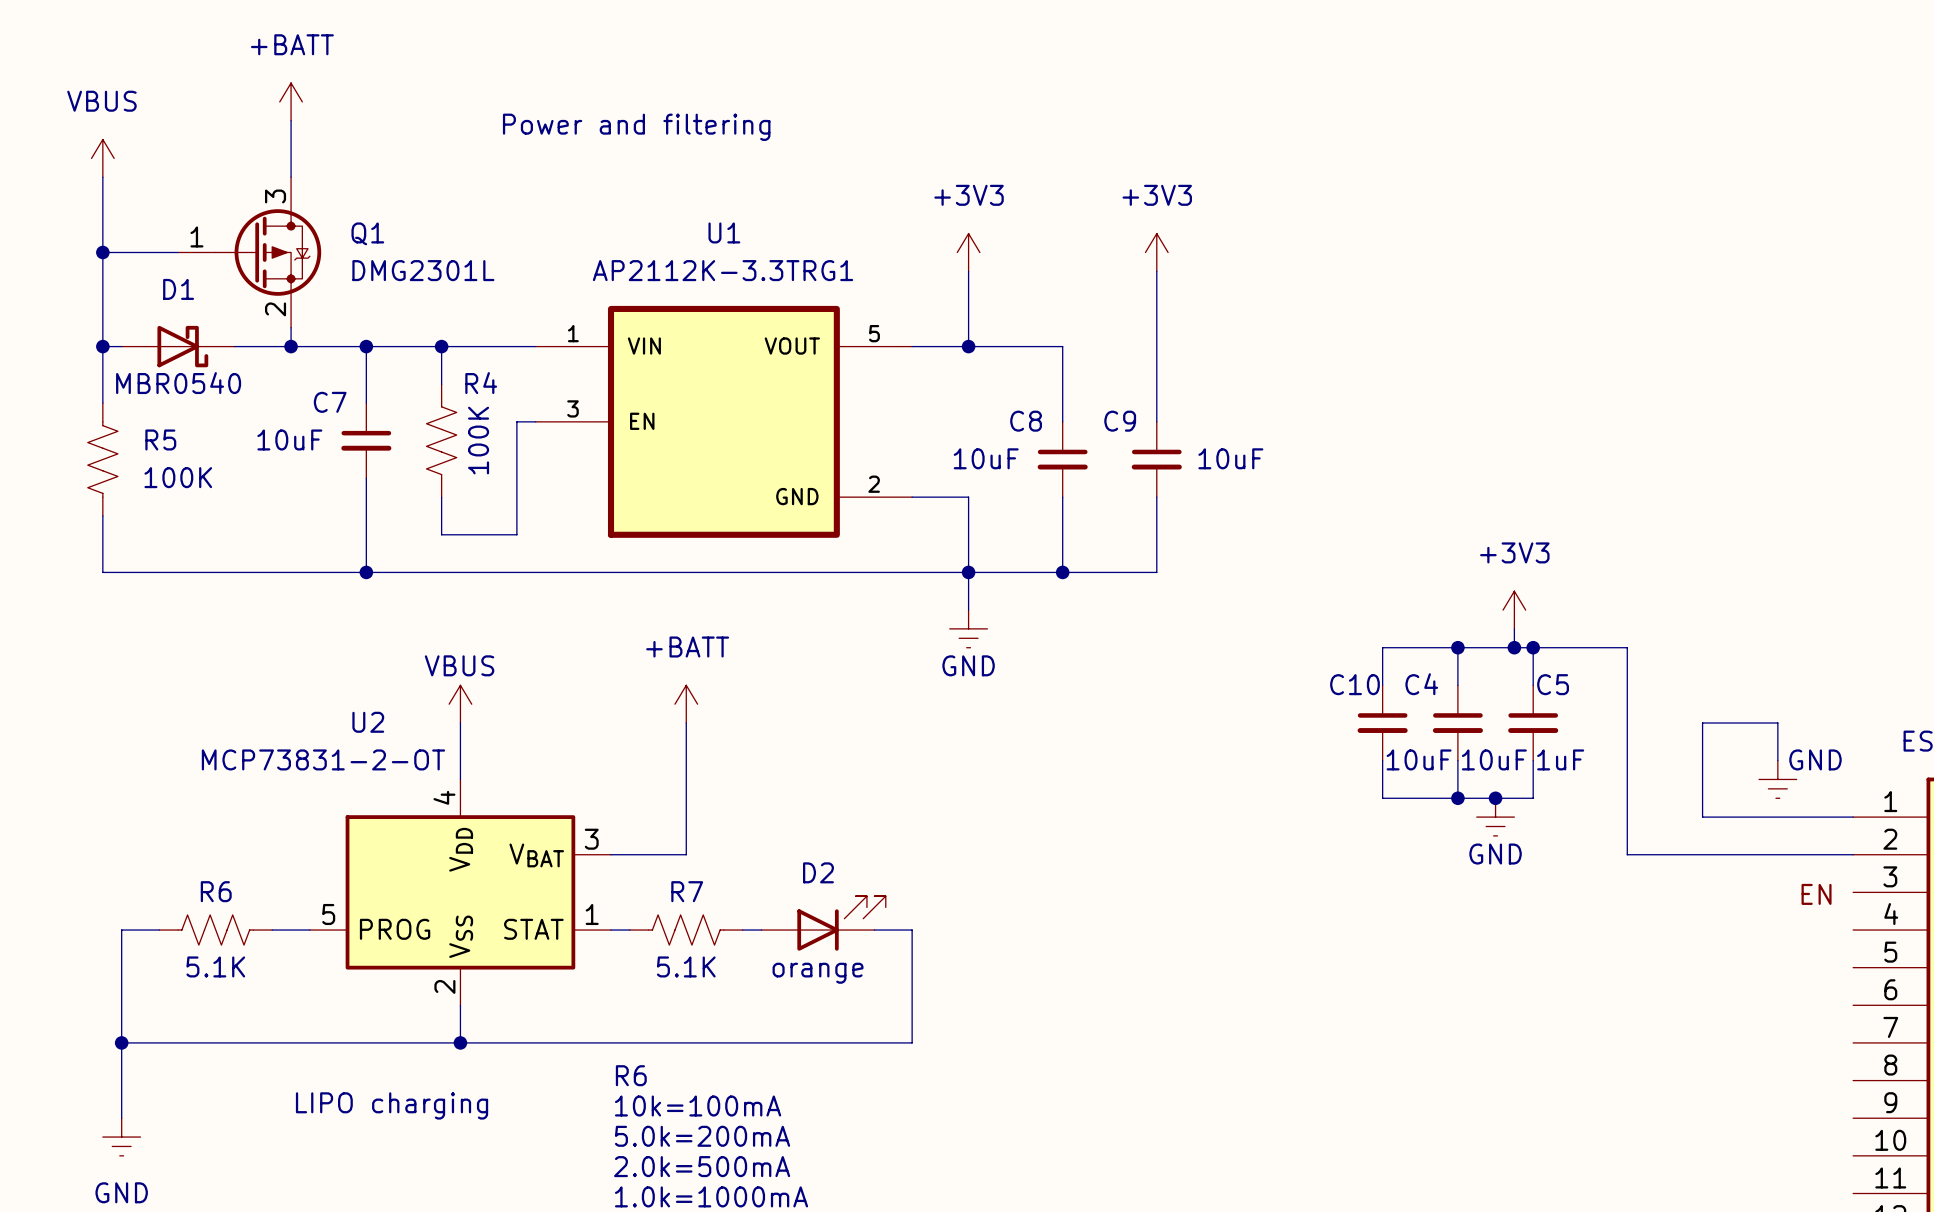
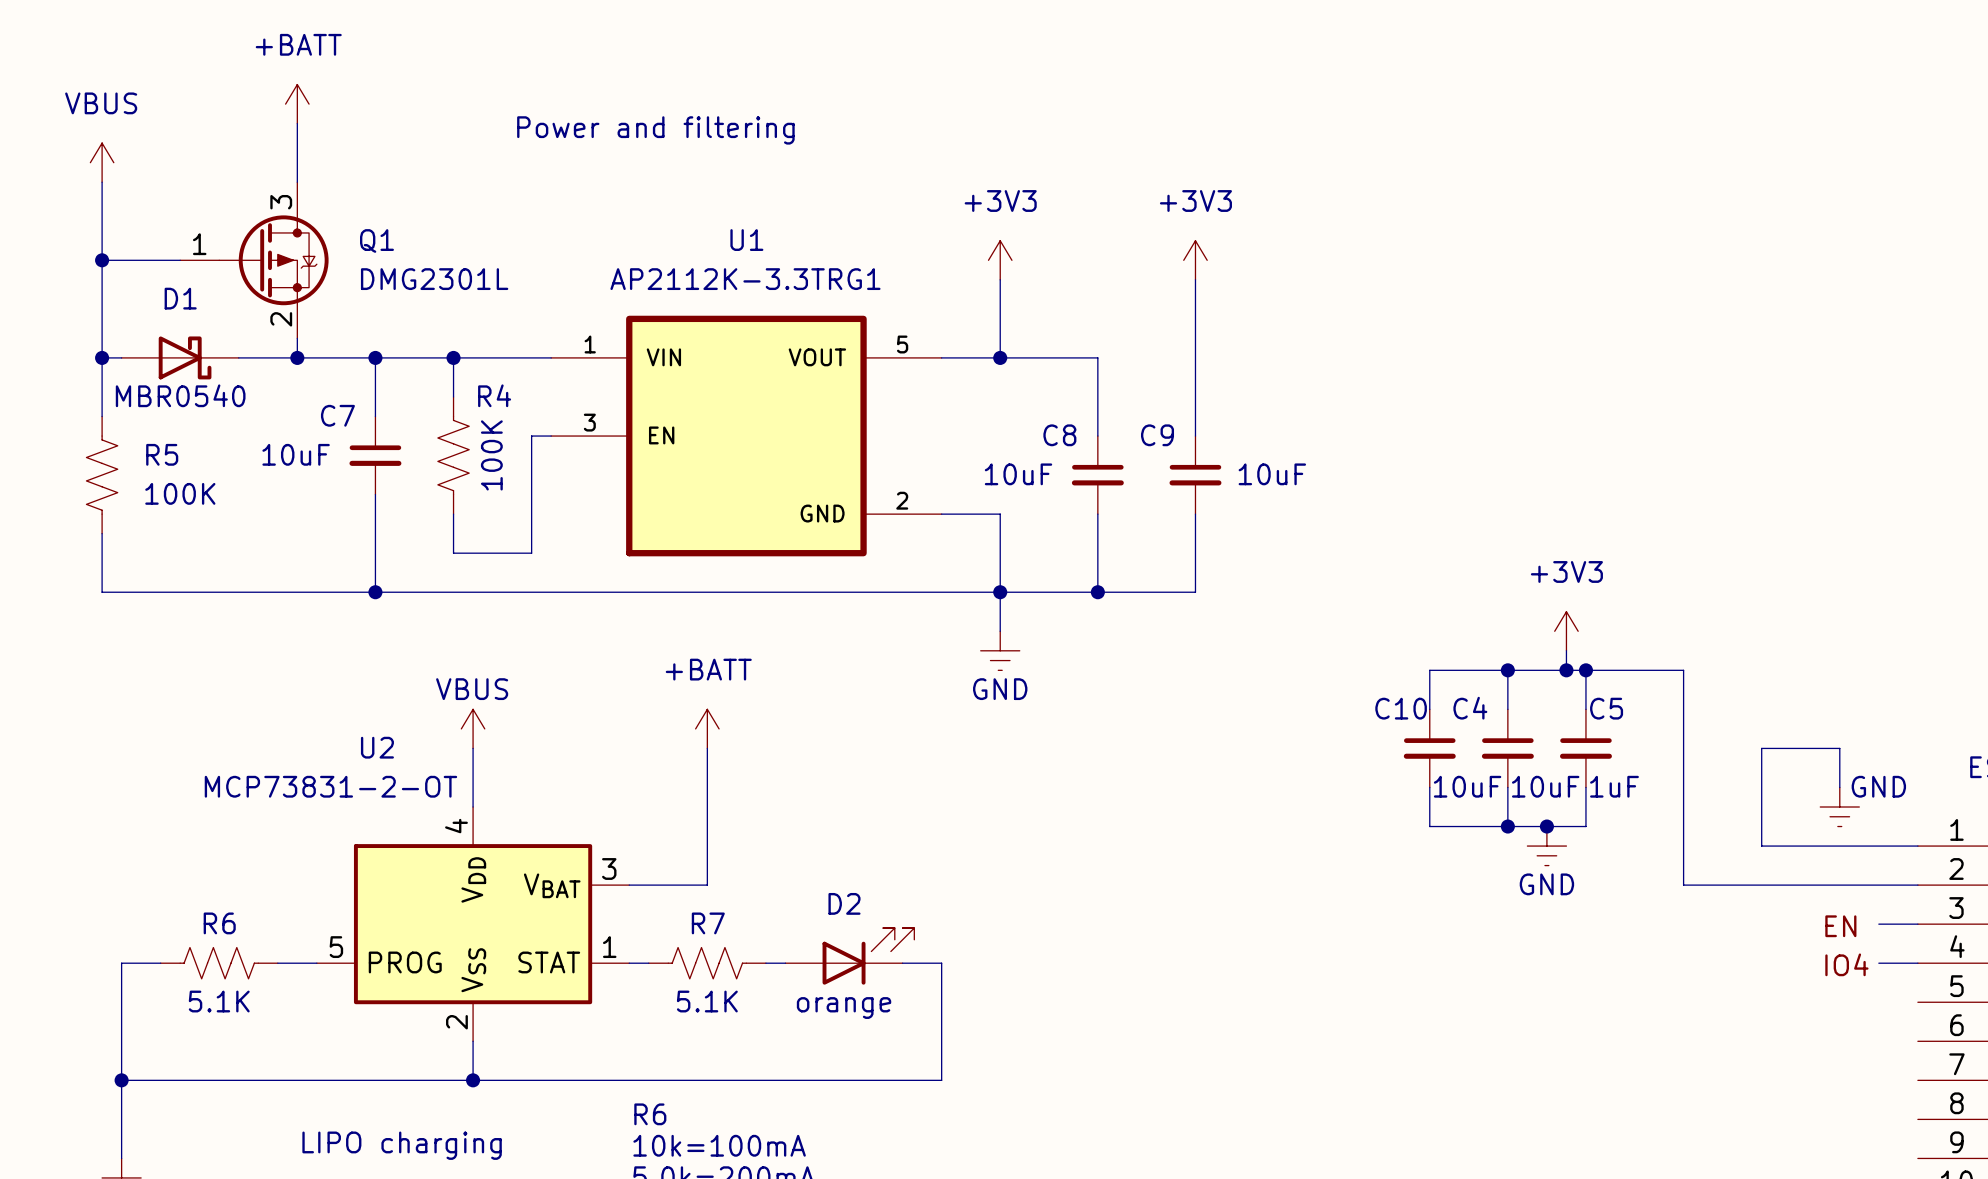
wire: none -> (1878, 924) (1917, 924)
label position: EN (1816, 894) -> EN (1840, 926)
wire: none -> (1878, 963) (1917, 963)
label: none -> IO4 (1846, 964)

